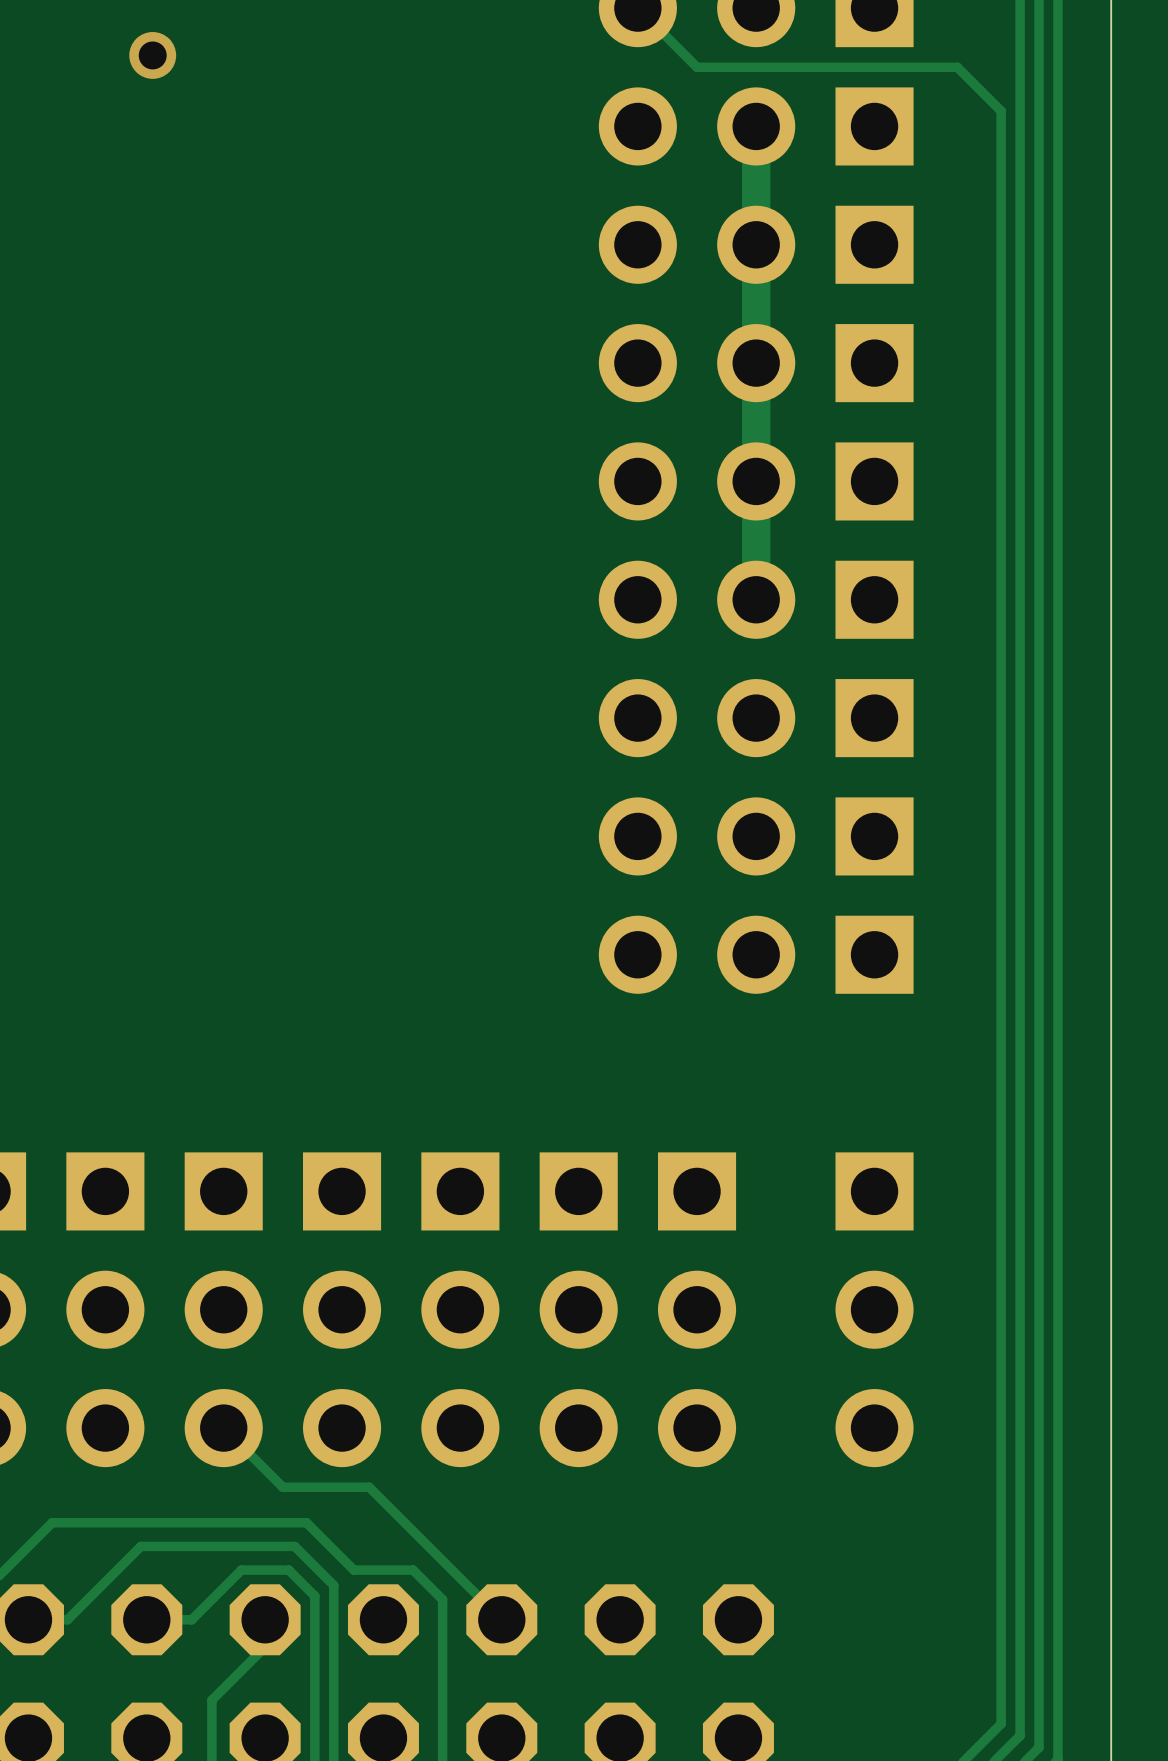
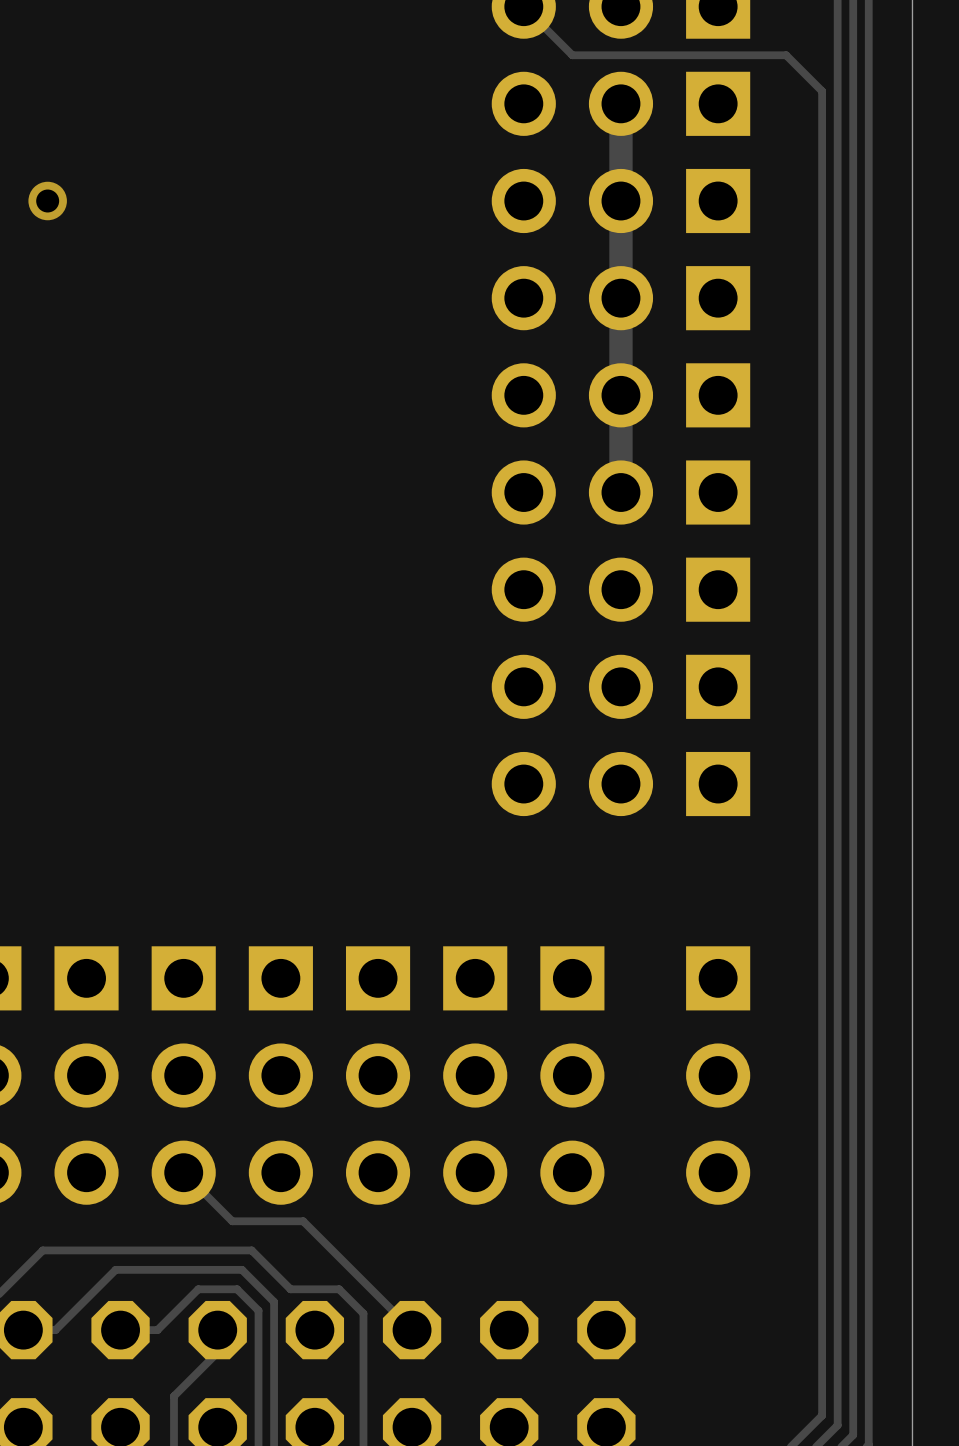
via: (152, 55) -> none
via: none -> (47, 201)

